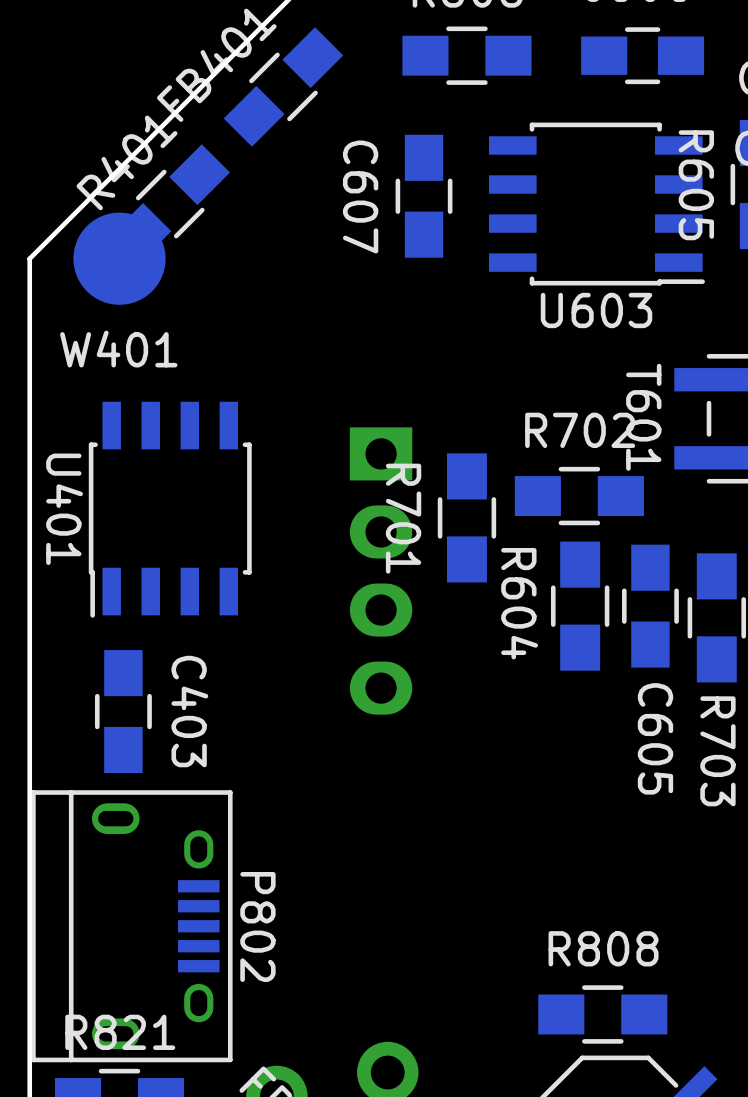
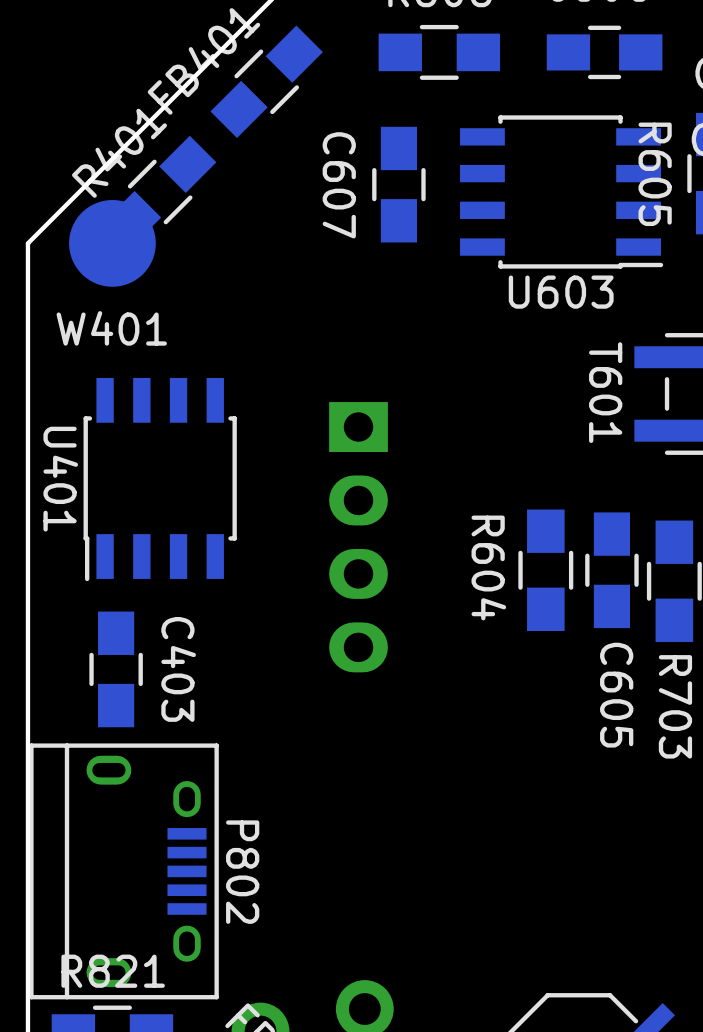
R702: (579, 496) -> none
R701: (466, 517) -> none
R808: (602, 1014) -> none

